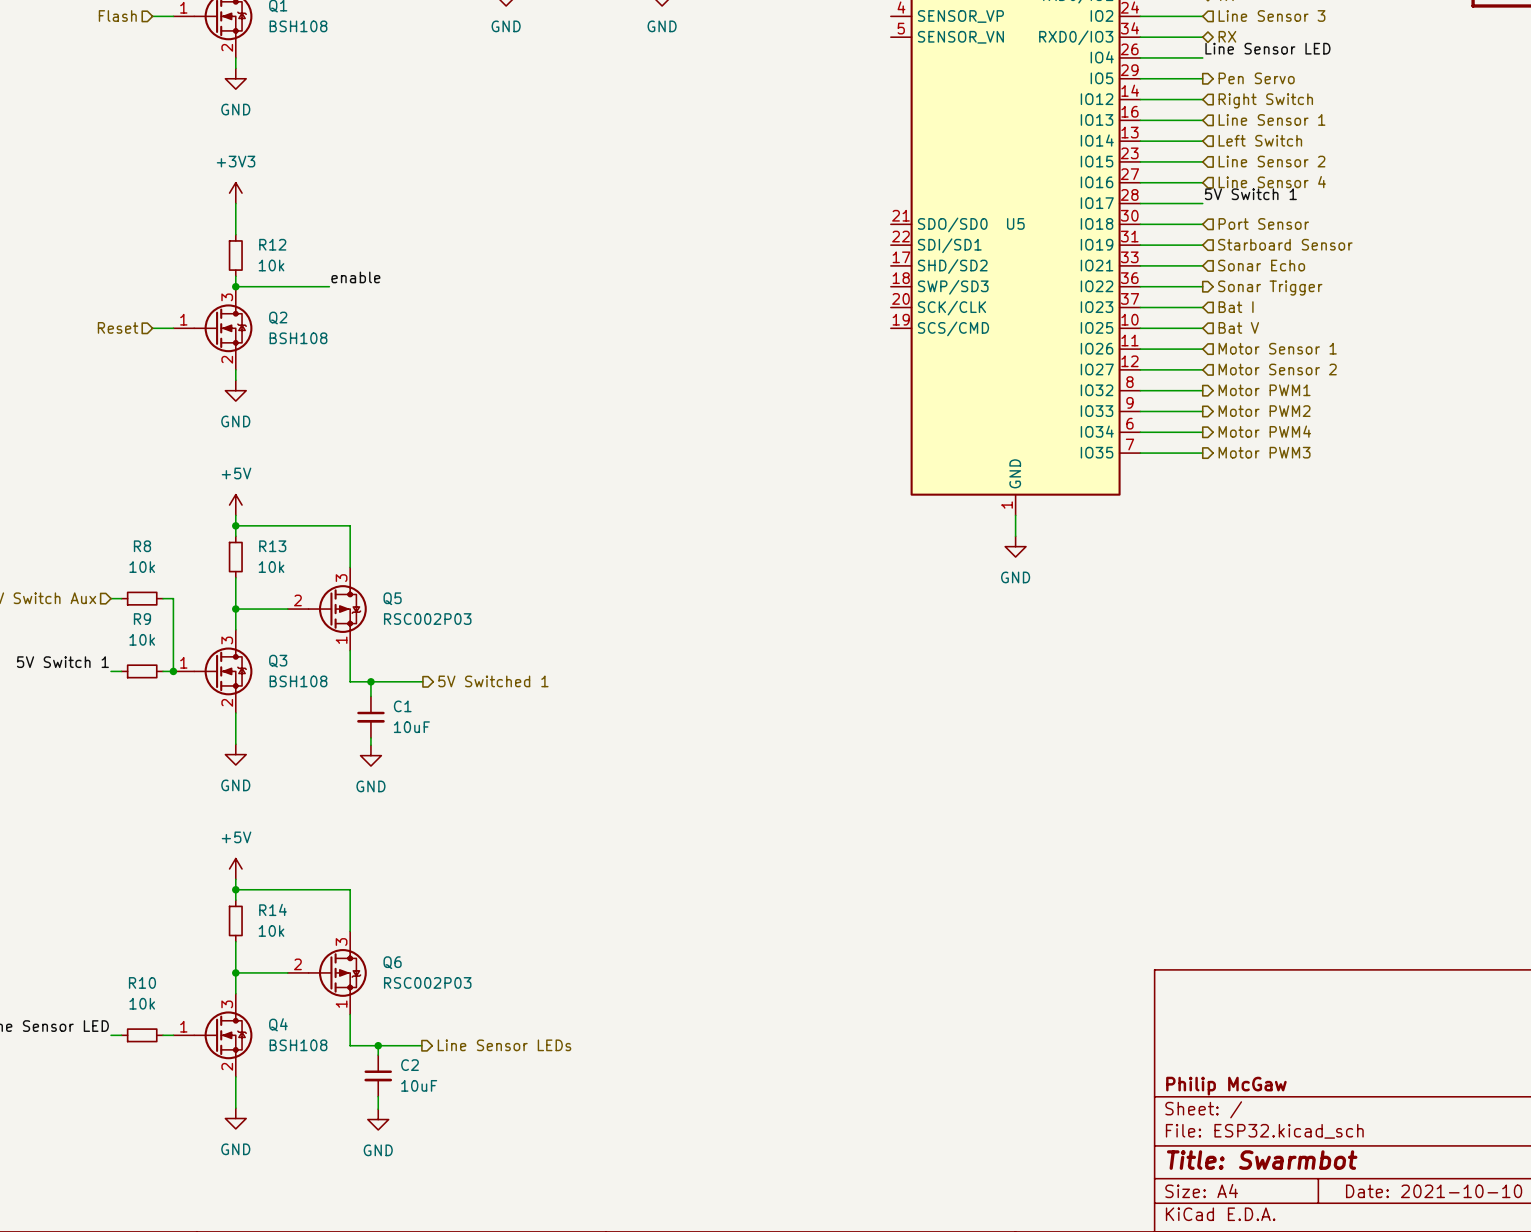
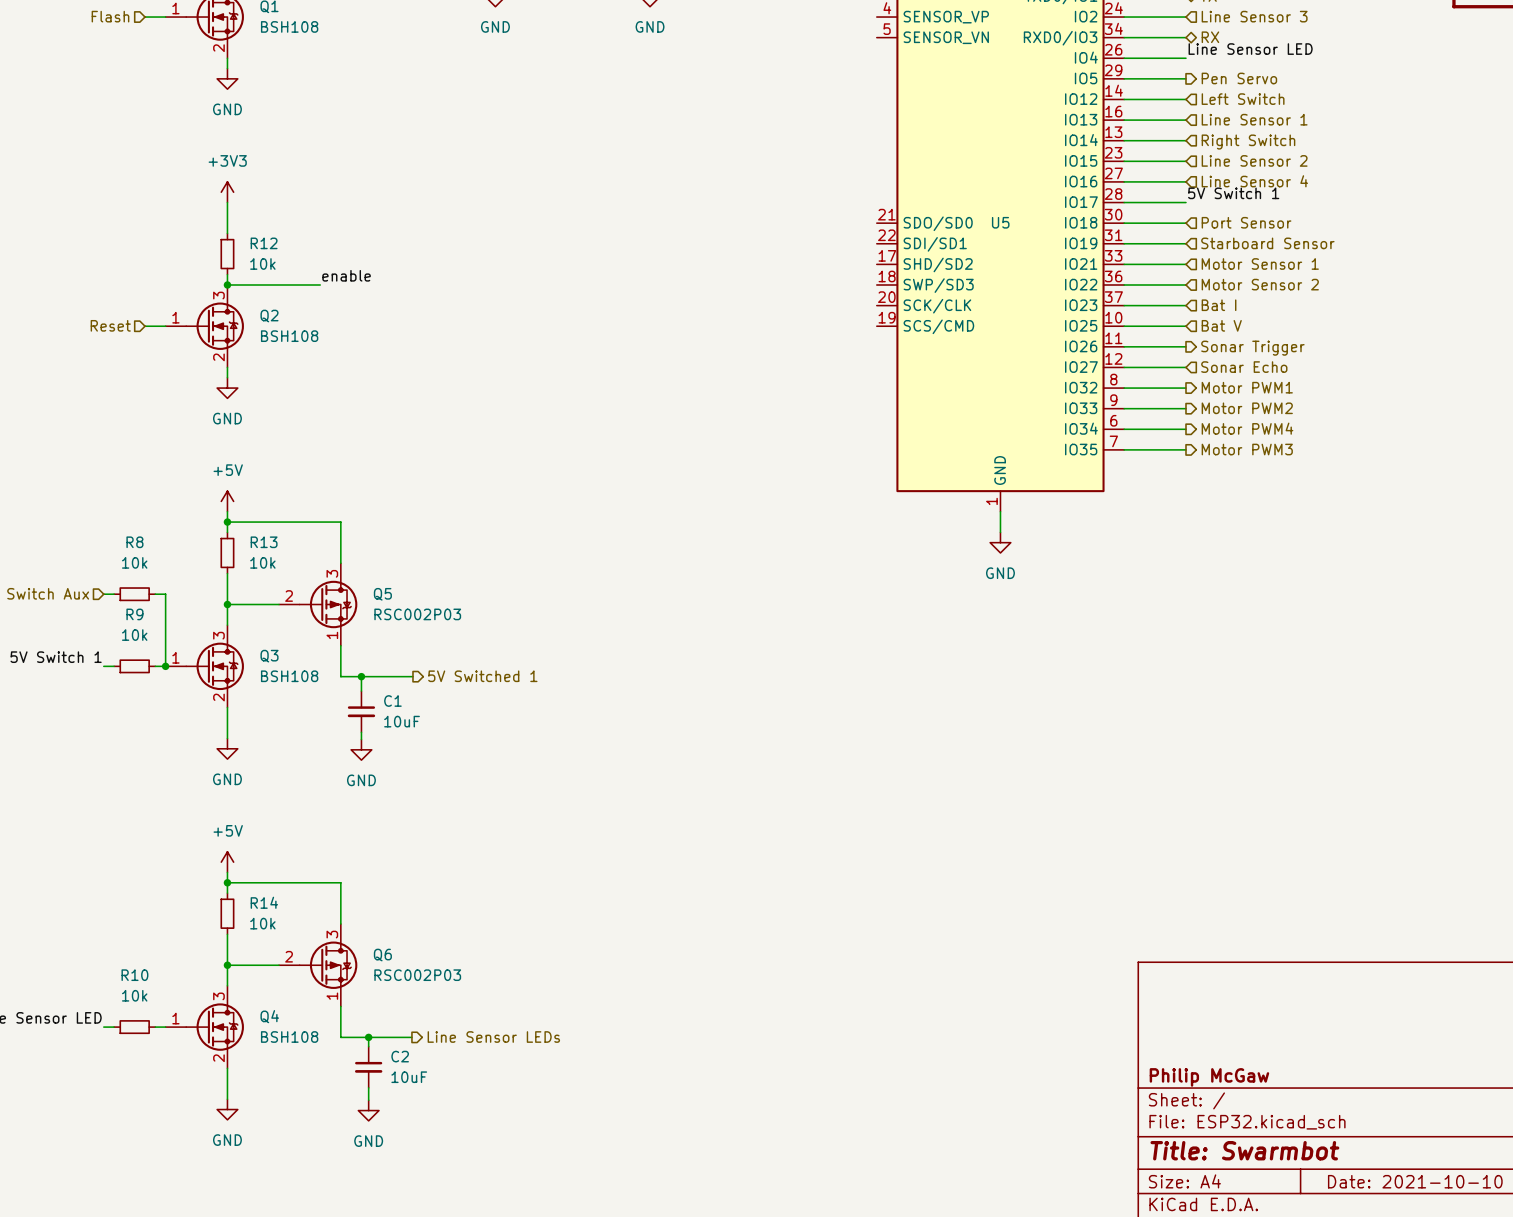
hierarchical label: Right Switch (1265, 100) -> Left Switch (1243, 99)
hierarchical label: Left Switch (1260, 140) -> Right Switch (1248, 142)
hierarchical label: Sonar Echo (1261, 265) -> Motor Sensor 1 (1260, 264)
hierarchical label shape: output (1270, 288) -> input (1260, 284)
hierarchical label: Sonar Trigger (1270, 288) -> Motor Sensor 2 (1260, 284)
hierarchical label shape: input (1277, 348) -> output (1252, 348)
hierarchical label: Motor Sensor 1 (1277, 348) -> Sonar Trigger (1252, 348)
hierarchical label: Motor Sensor 2 (1277, 369) -> Sonar Echo (1244, 367)

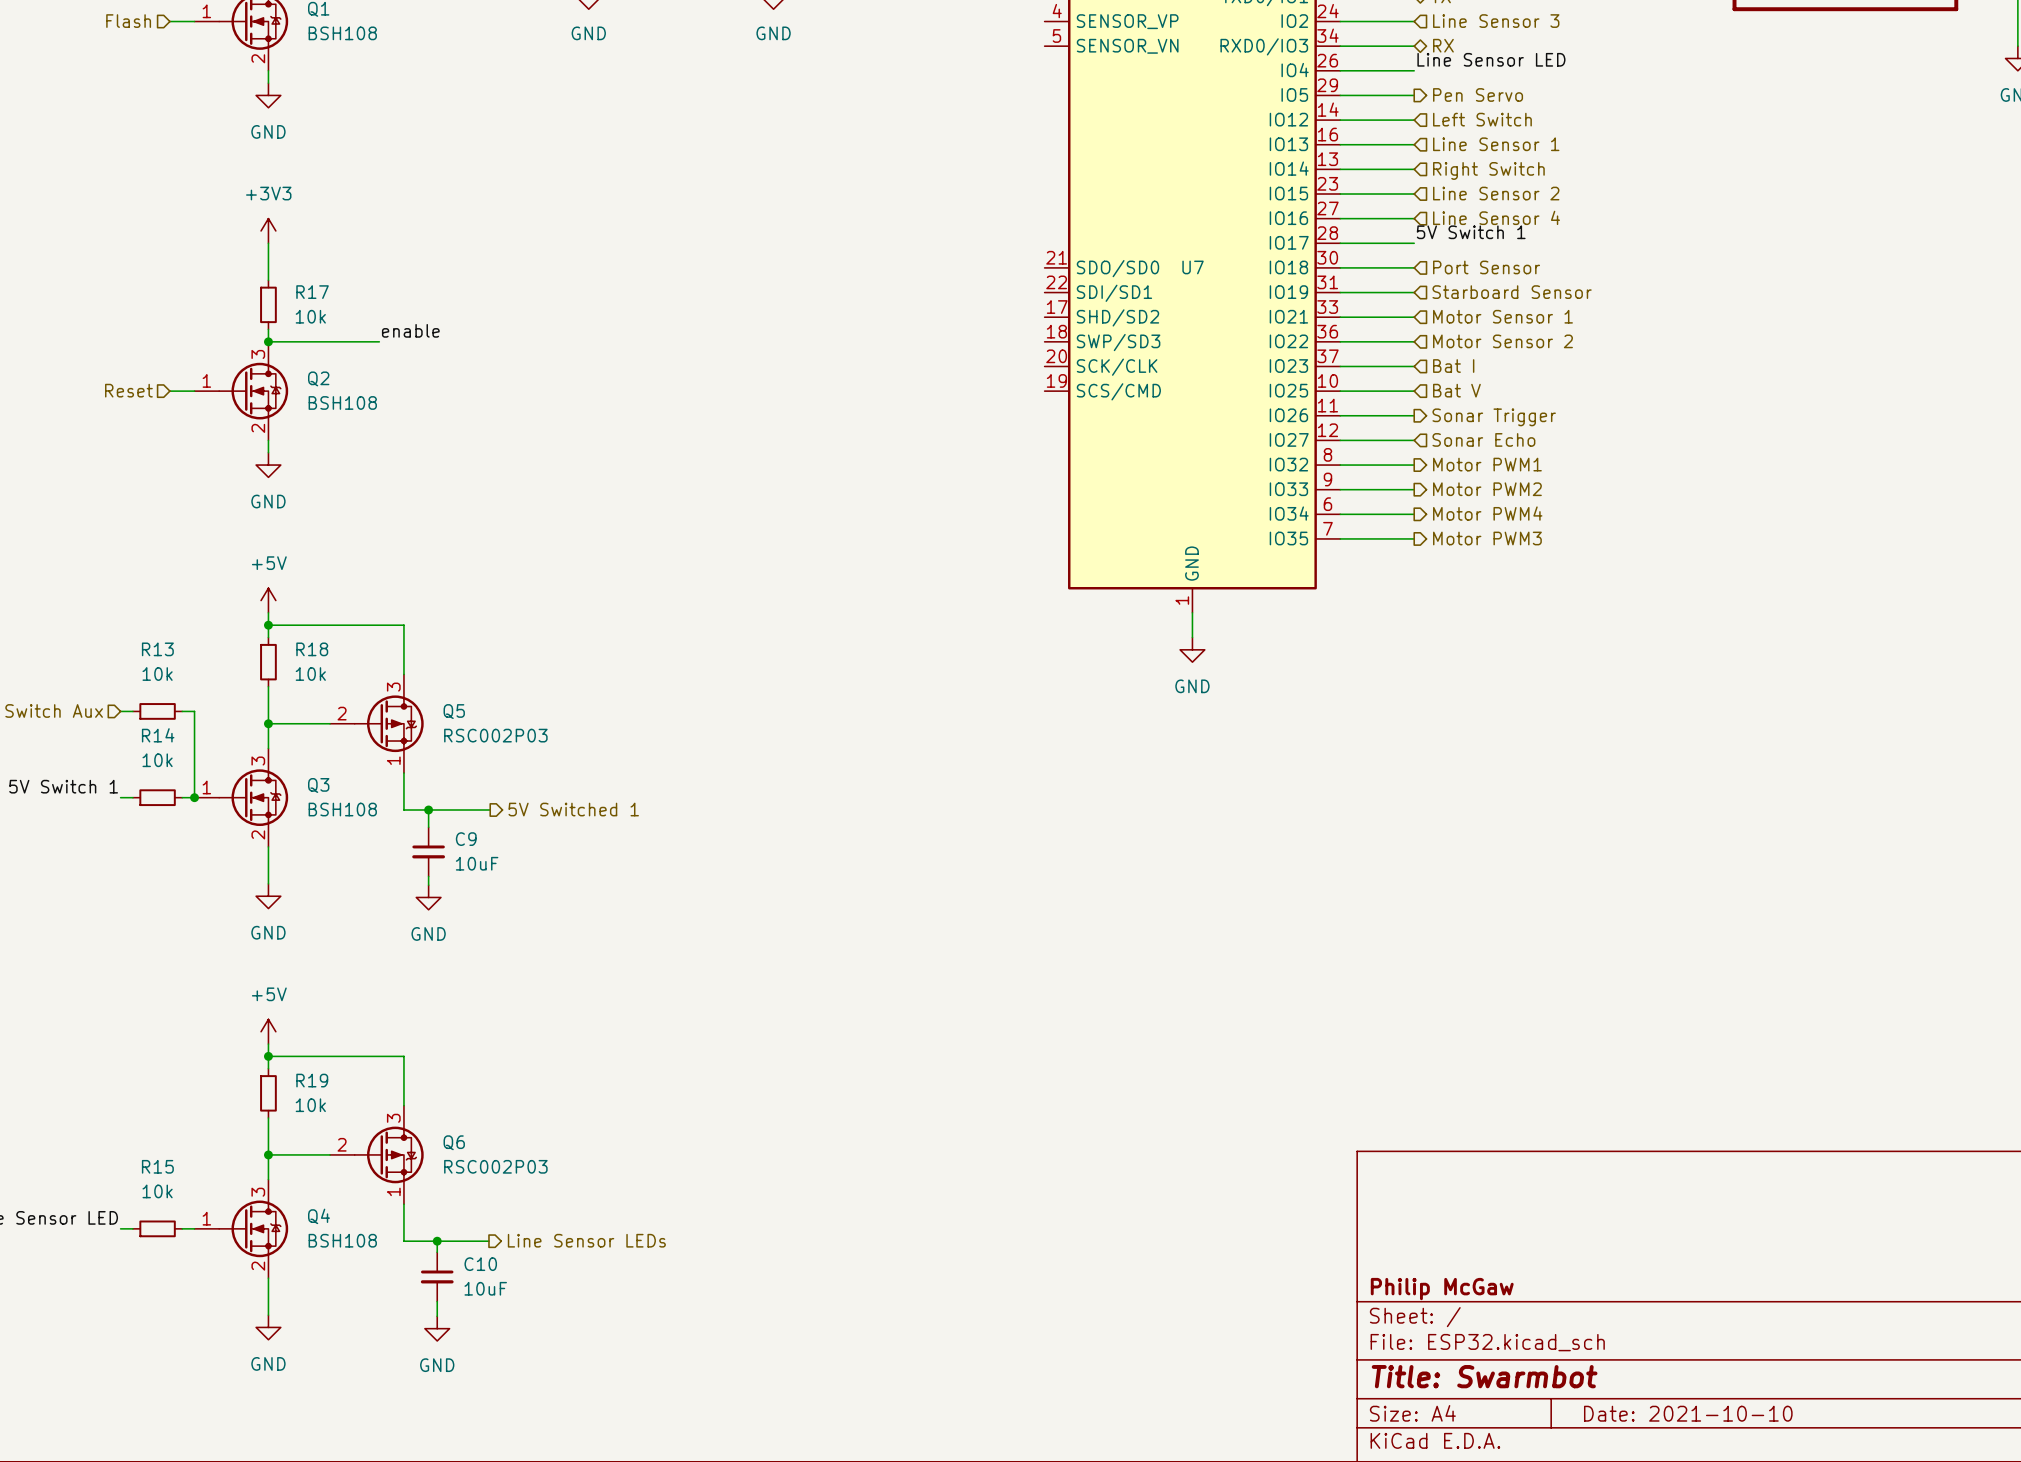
U5 name: U5 (1000, 222) -> U7 (1193, 267)
R12 name: R12 (264, 243) -> R17 (312, 292)
R8 name: R8 (134, 542) -> R13 (157, 649)
R13 name: R13 (264, 542) -> R18 (312, 649)
R9 name: R9 (134, 614) -> R14 (158, 735)
C1 name: C1 (392, 701) -> C9 (466, 839)
R14 name: R14 (264, 902) -> R19 (312, 1080)
R10 name: R10 (134, 975) -> R15 (157, 1166)
C2 name: C2 (400, 1056) -> C10 (480, 1264)

